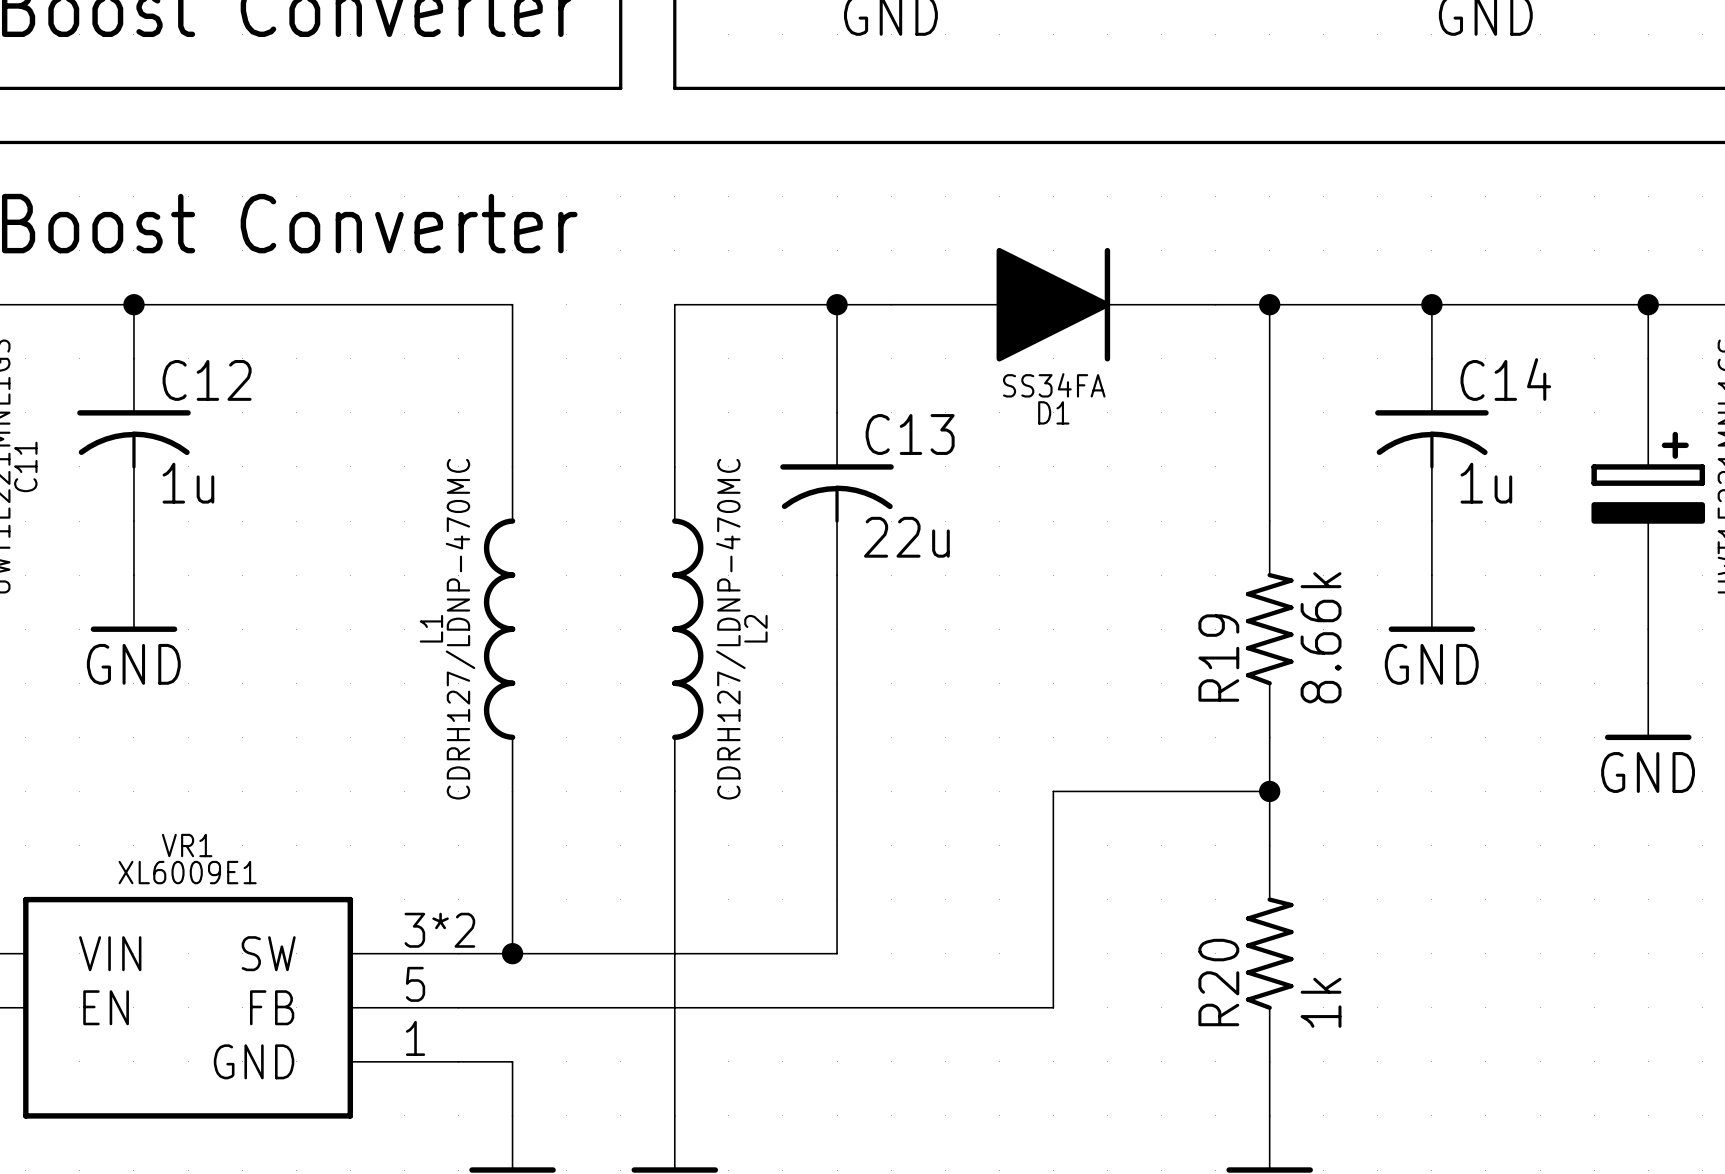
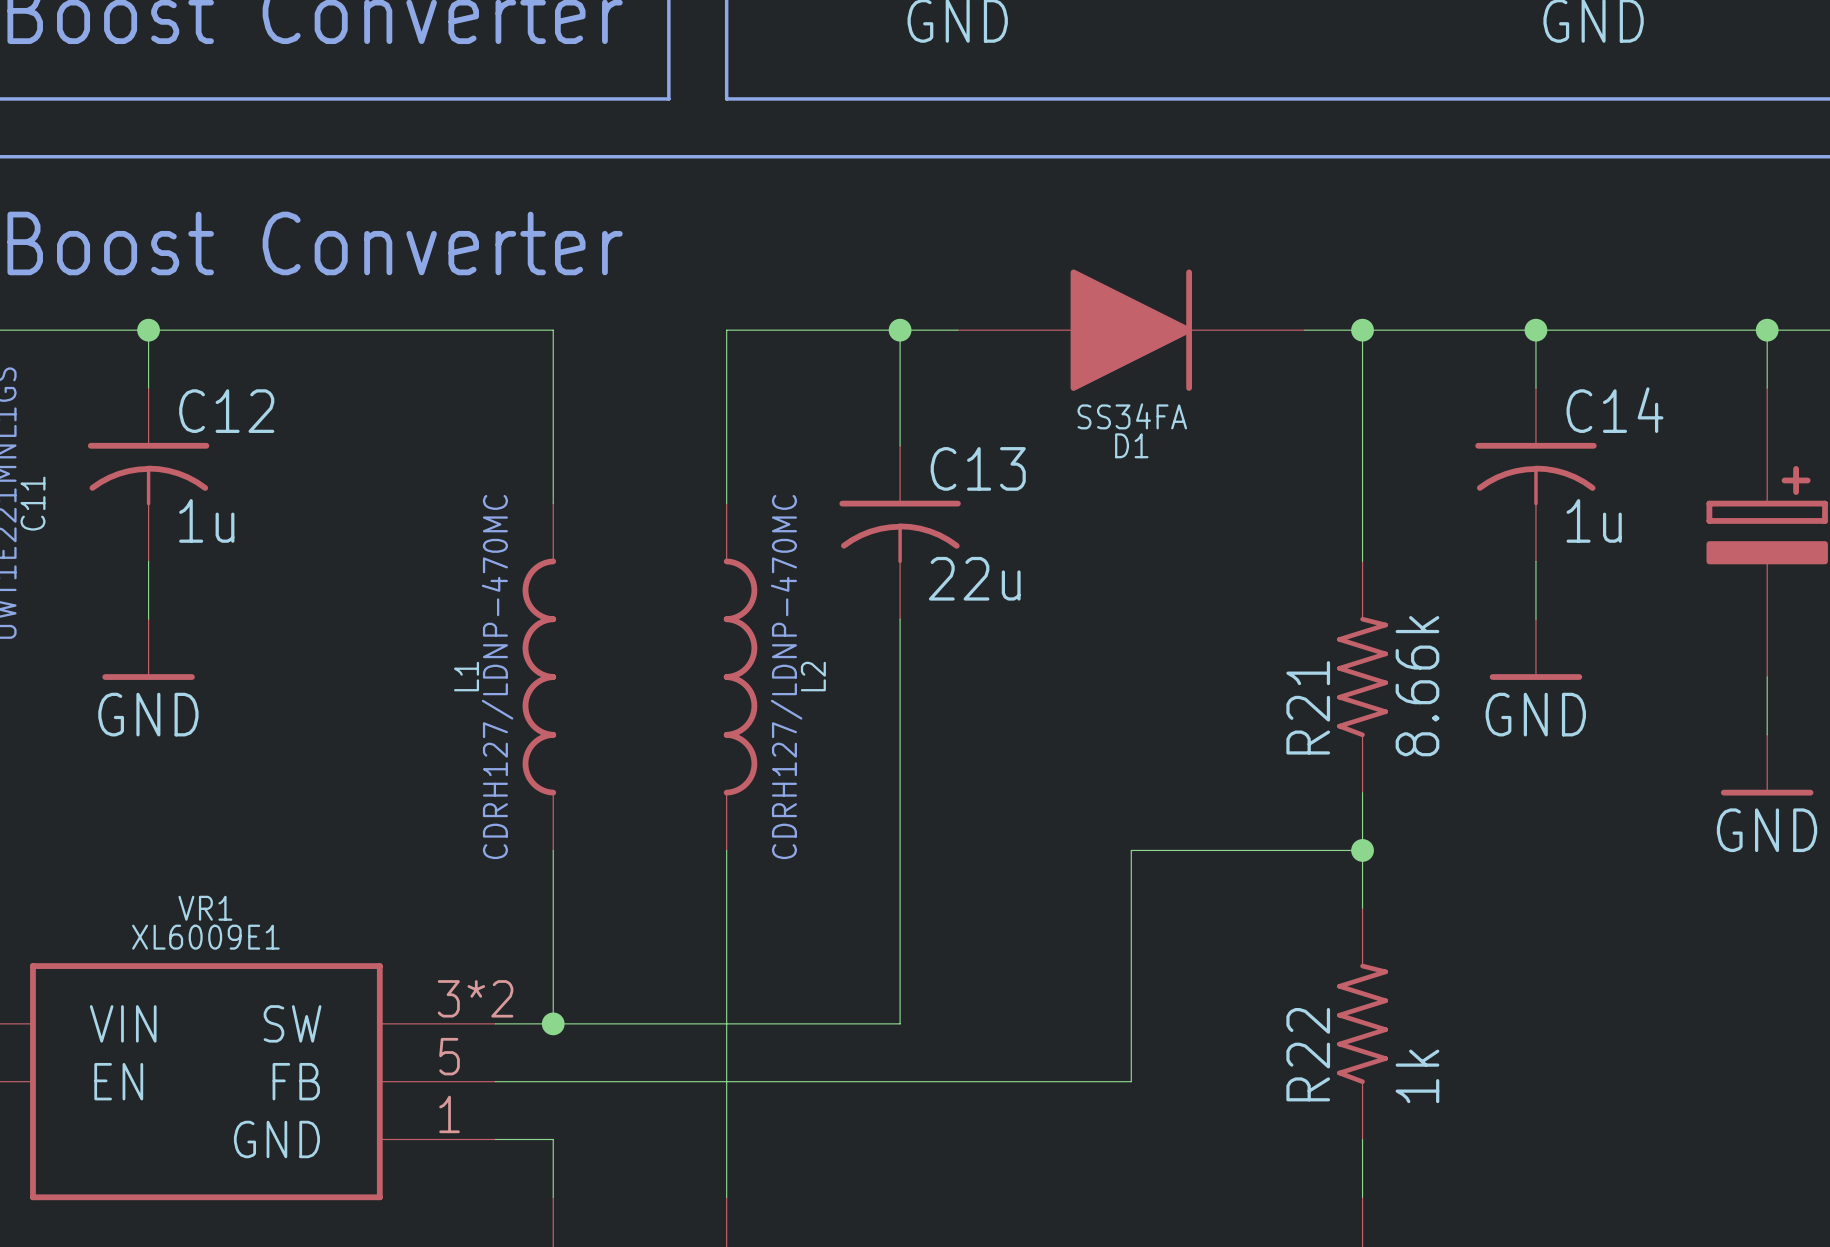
R19 name: R19 (1218, 658) -> R21 (1308, 707)
R20 name: R20 (1218, 982) -> R22 (1308, 1054)

